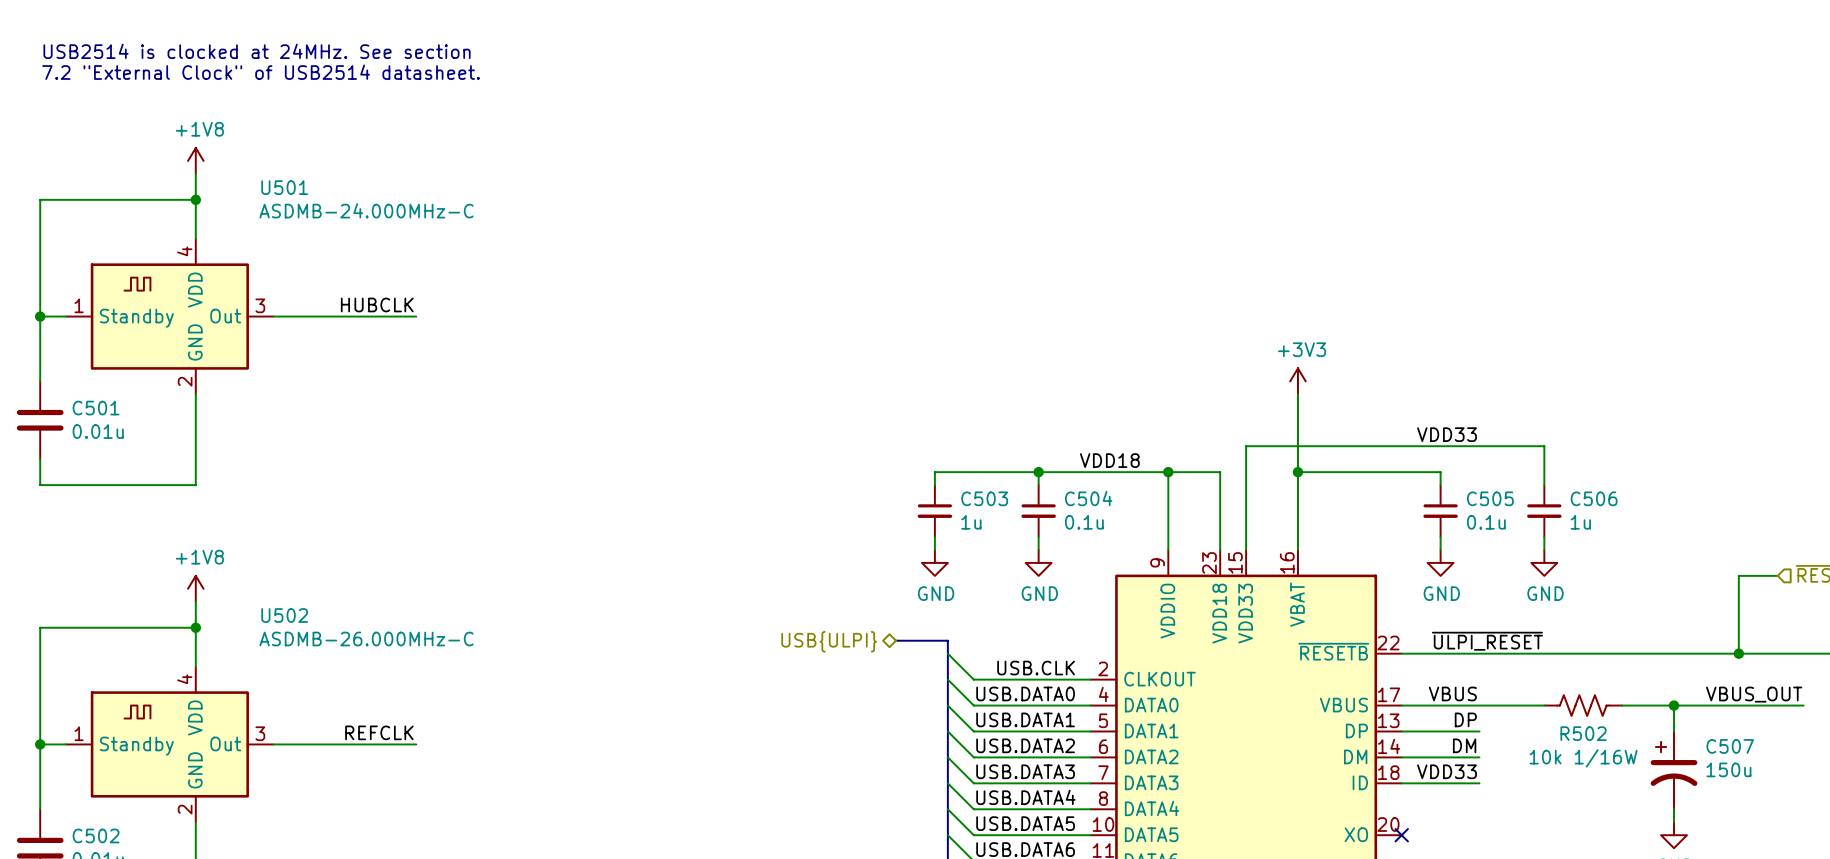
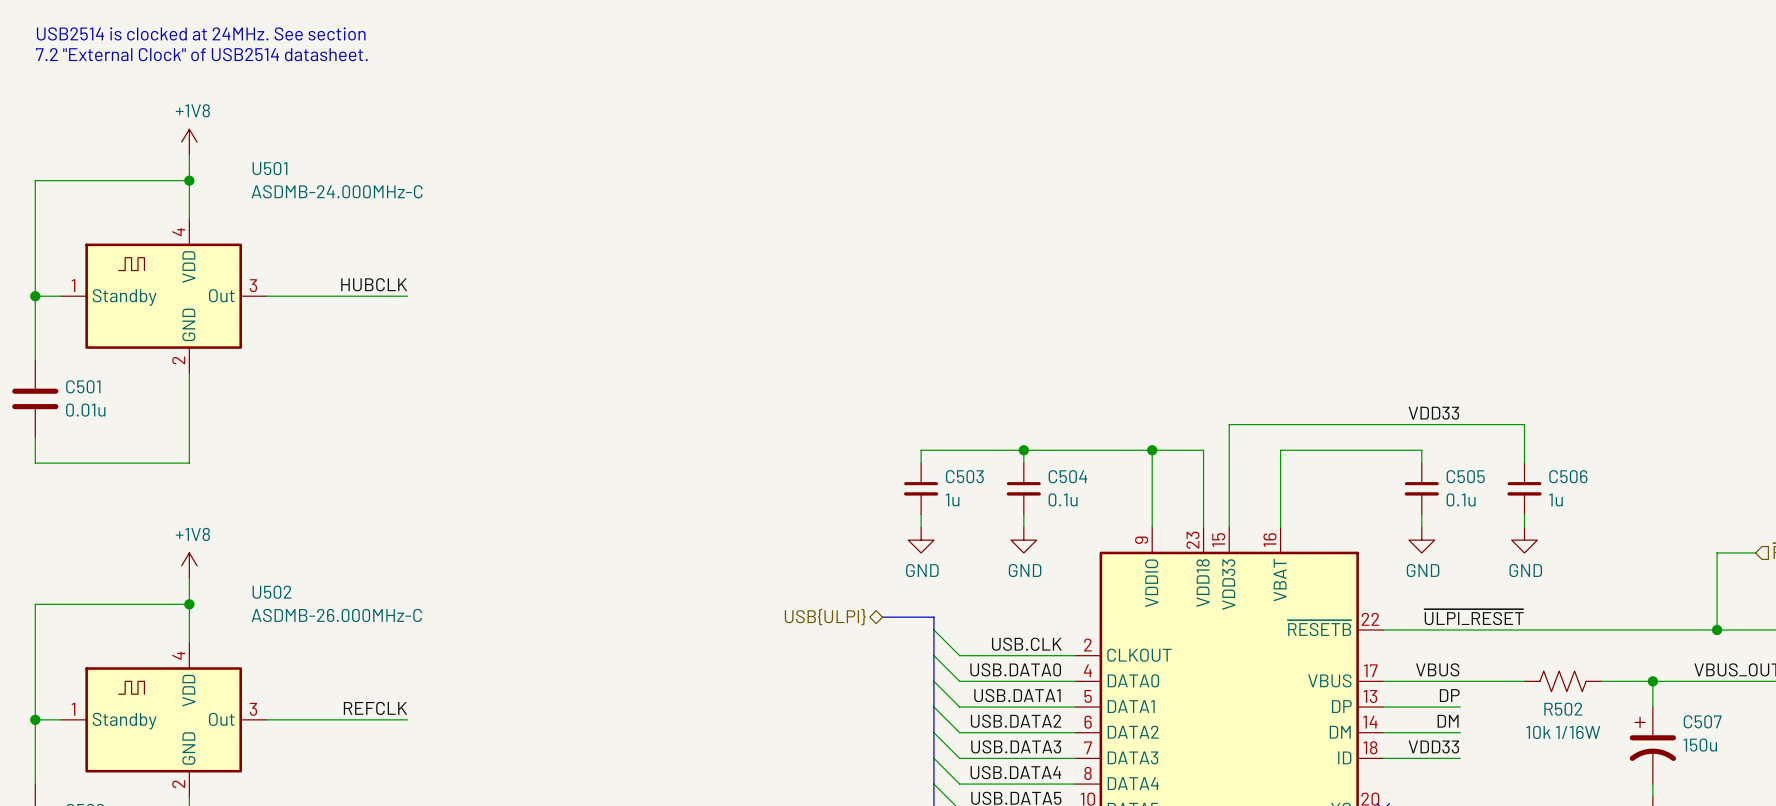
power symbol: +3V3 (1297, 381) -> none
wire: (1297, 394) (1297, 472) -> none
label: VDD18 (1109, 460) -> none
junction: (1297, 472) -> none

